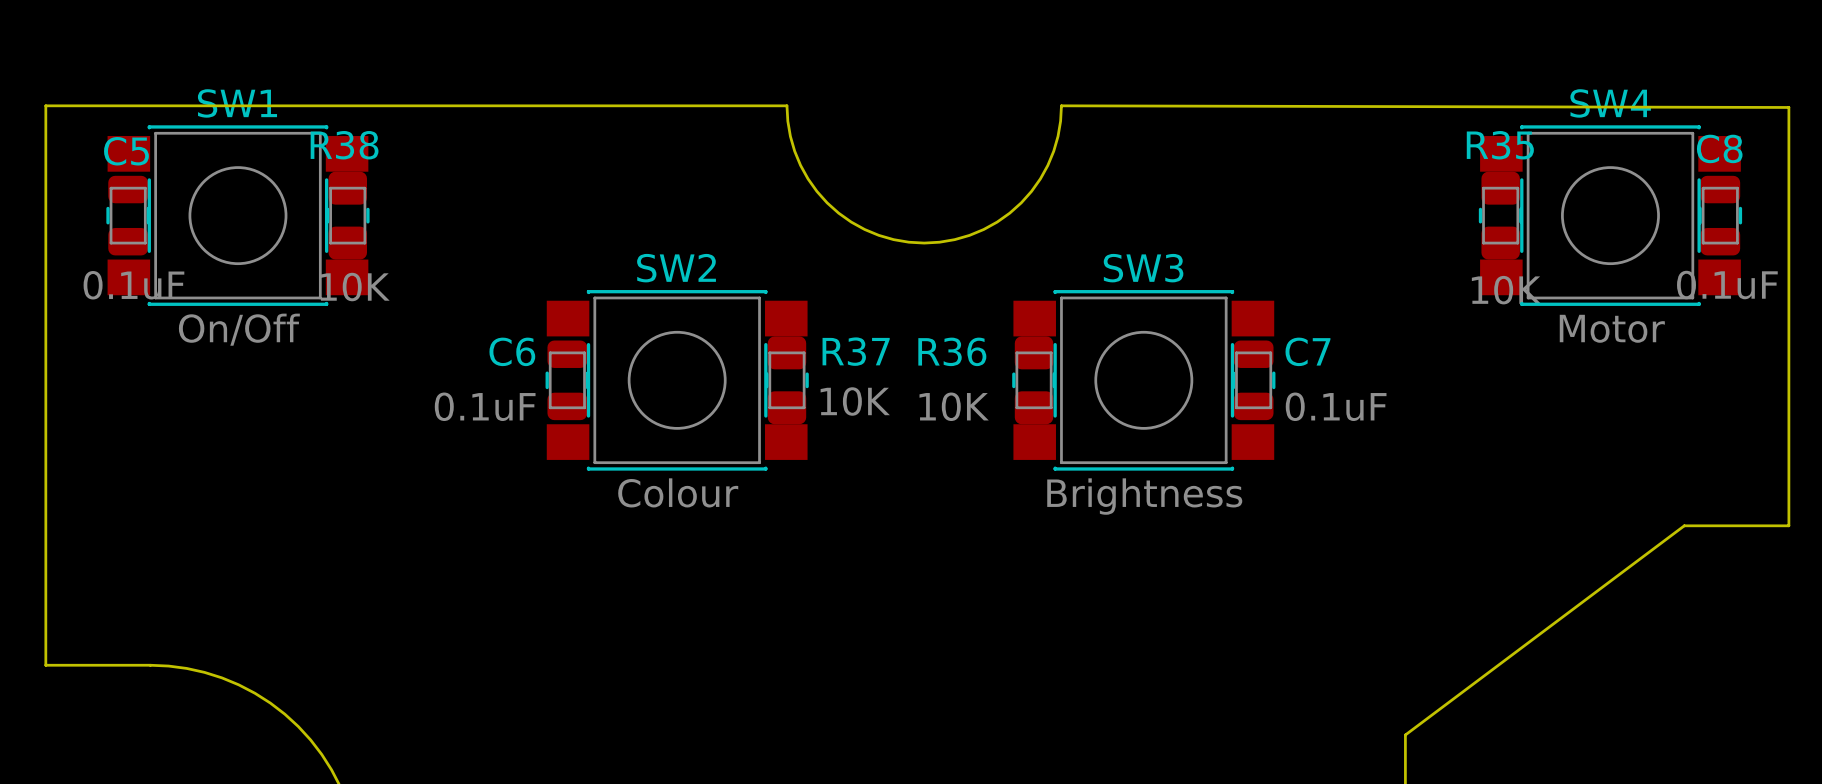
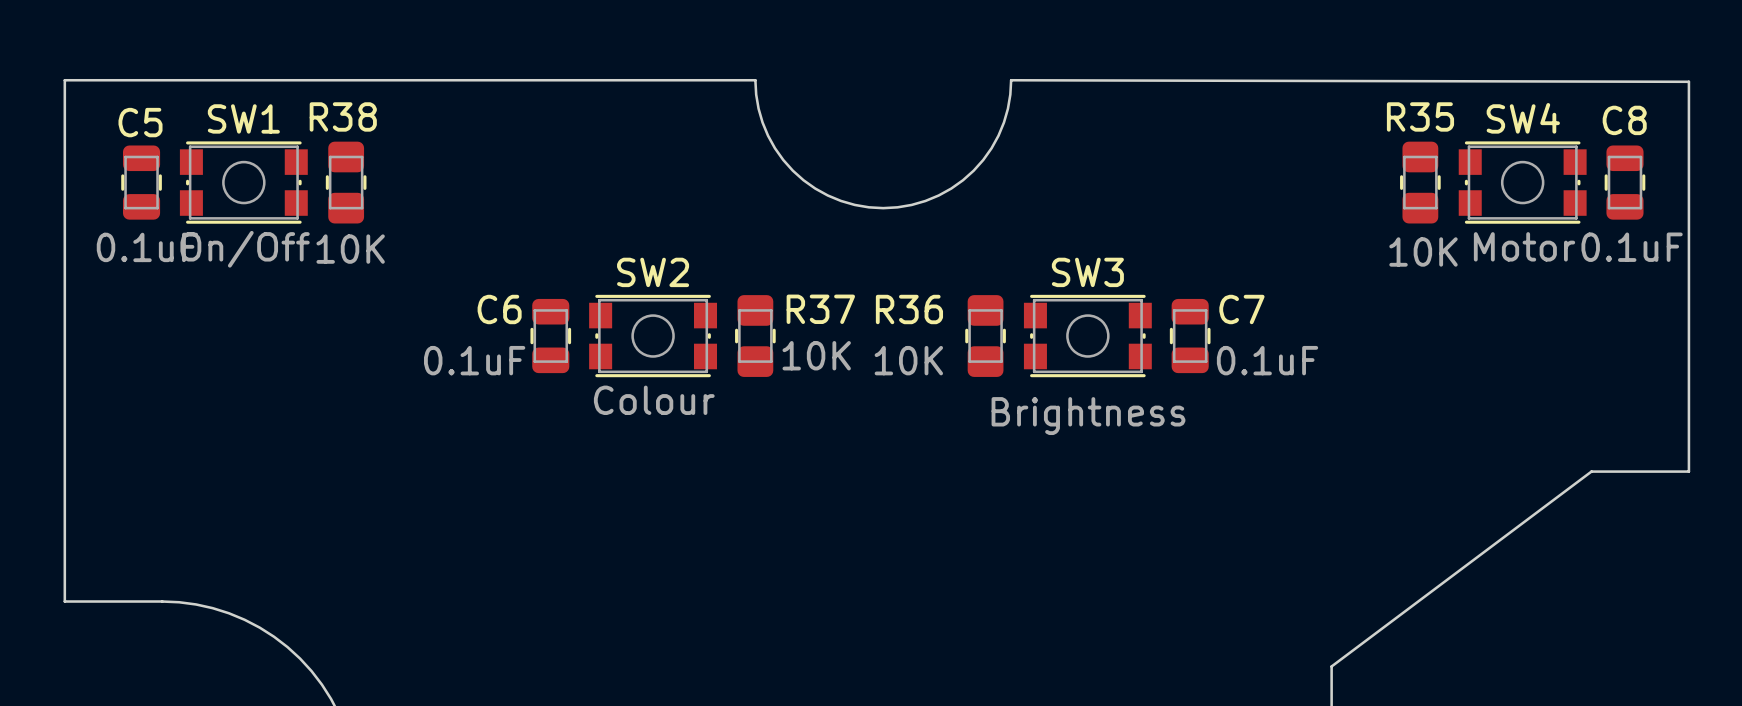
SW1 footprint: [107, 125, 369, 306] -> [179, 141, 308, 224]
SW4 footprint: [1480, 125, 1741, 306] -> [1458, 141, 1587, 224]
SW2 footprint: [546, 290, 808, 471] -> [589, 294, 718, 378]
SW3 footprint: [1013, 290, 1275, 471] -> [1023, 294, 1152, 378]

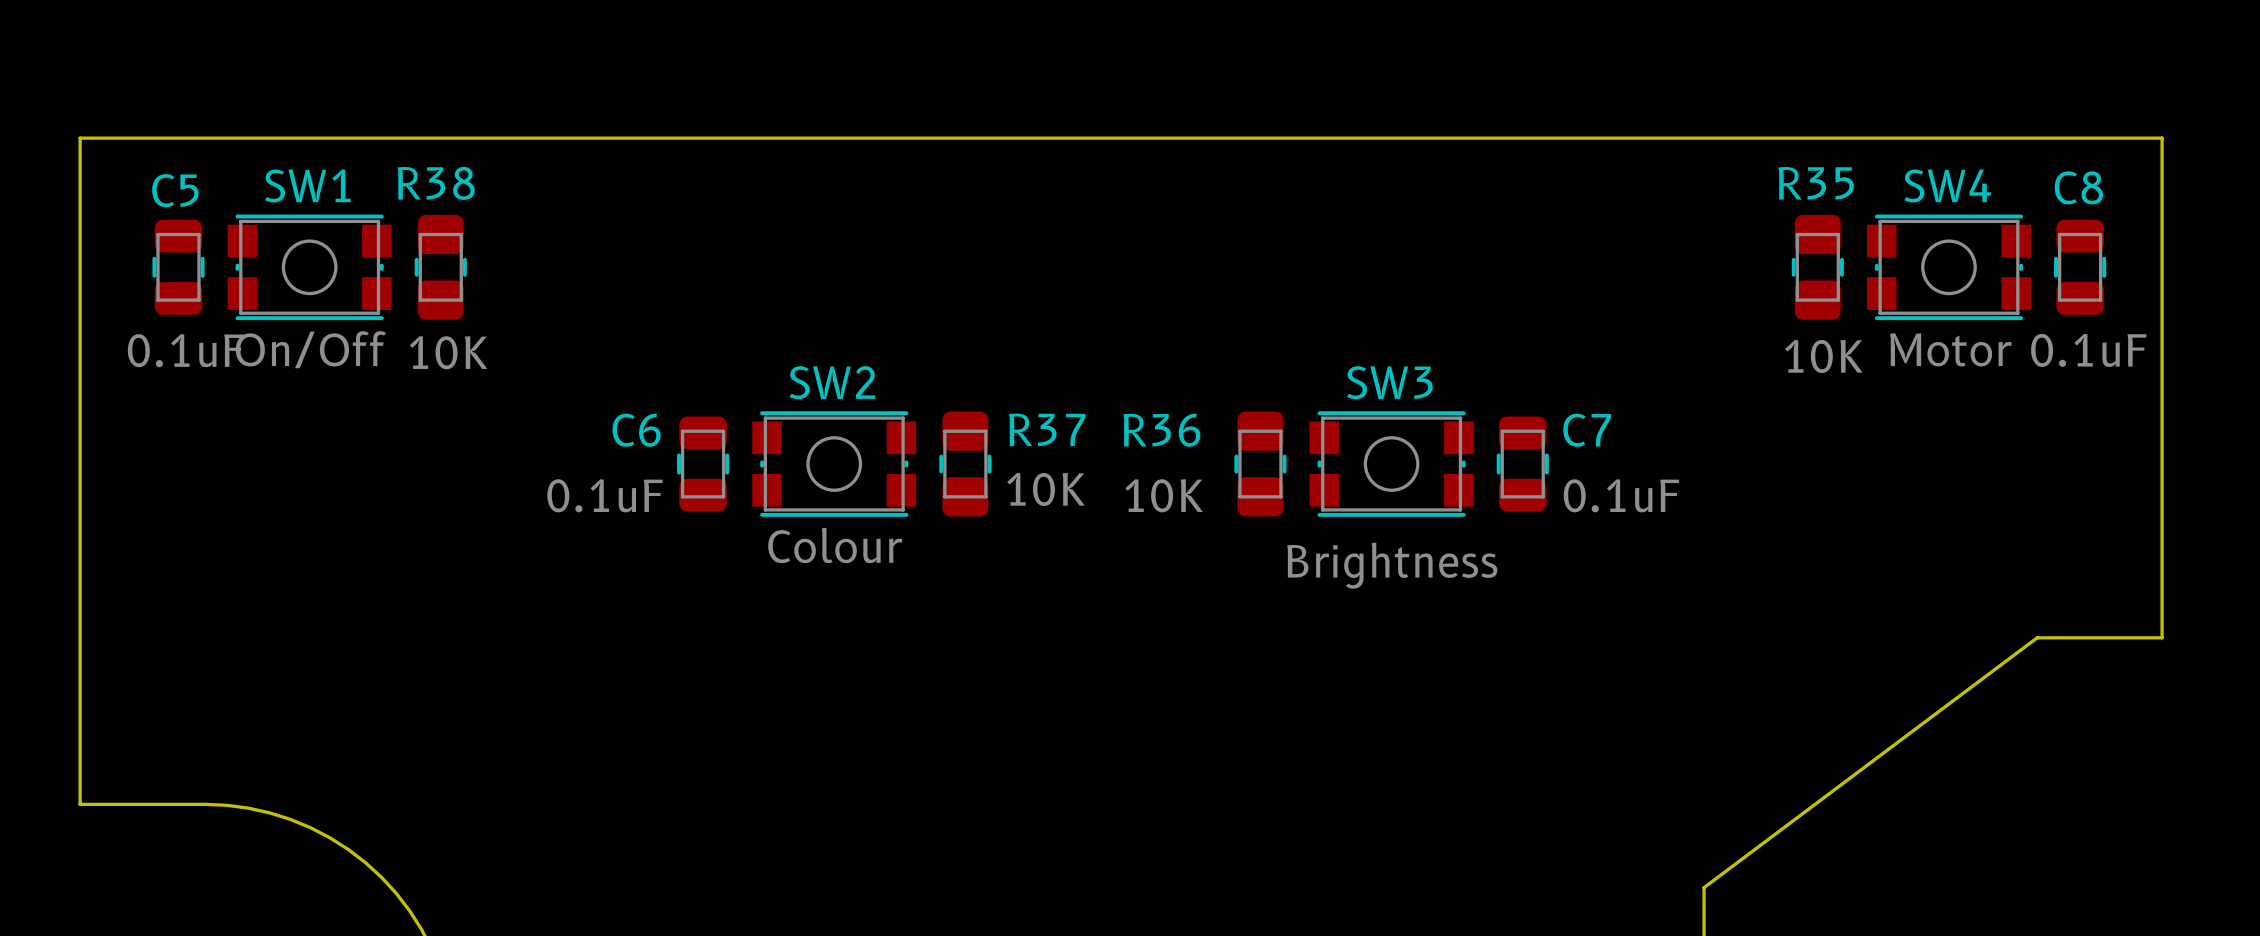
board edge: (64, 81) (64, 80) (755, 80) (756, 94) (762, 122) (774, 148) (792, 170) (815, 188) (841, 200) (854, 204) (883, 208) (911, 204) (925, 200) (951, 188) (973, 170) (991, 148) (1003, 122) (1010, 94) (1011, 80) (1688, 81) -> (80, 138) (2162, 138)

